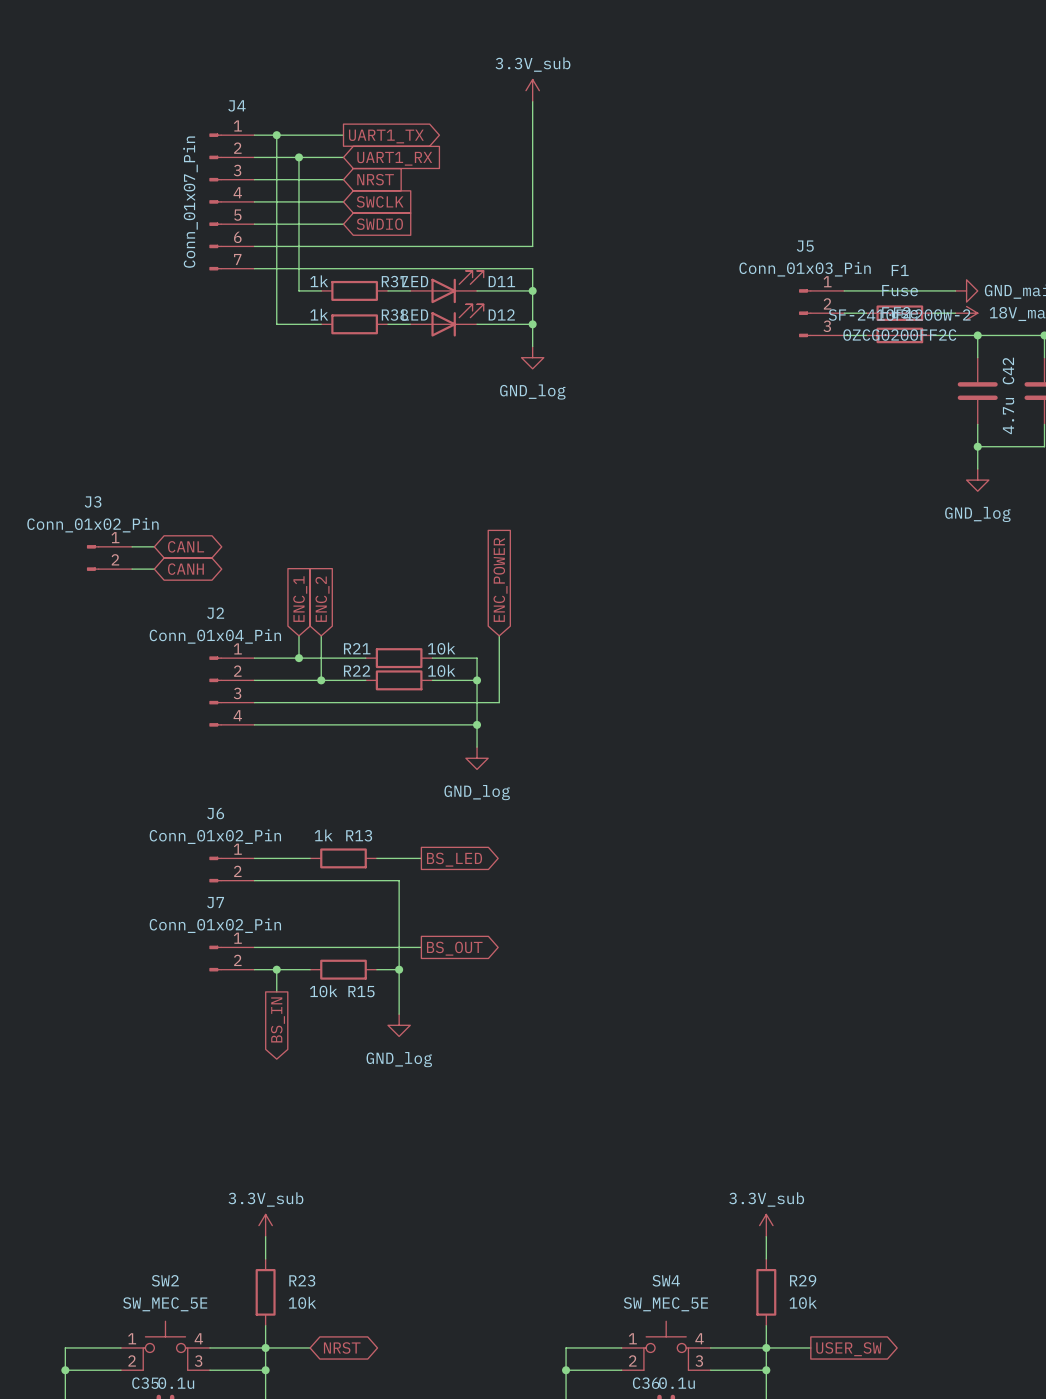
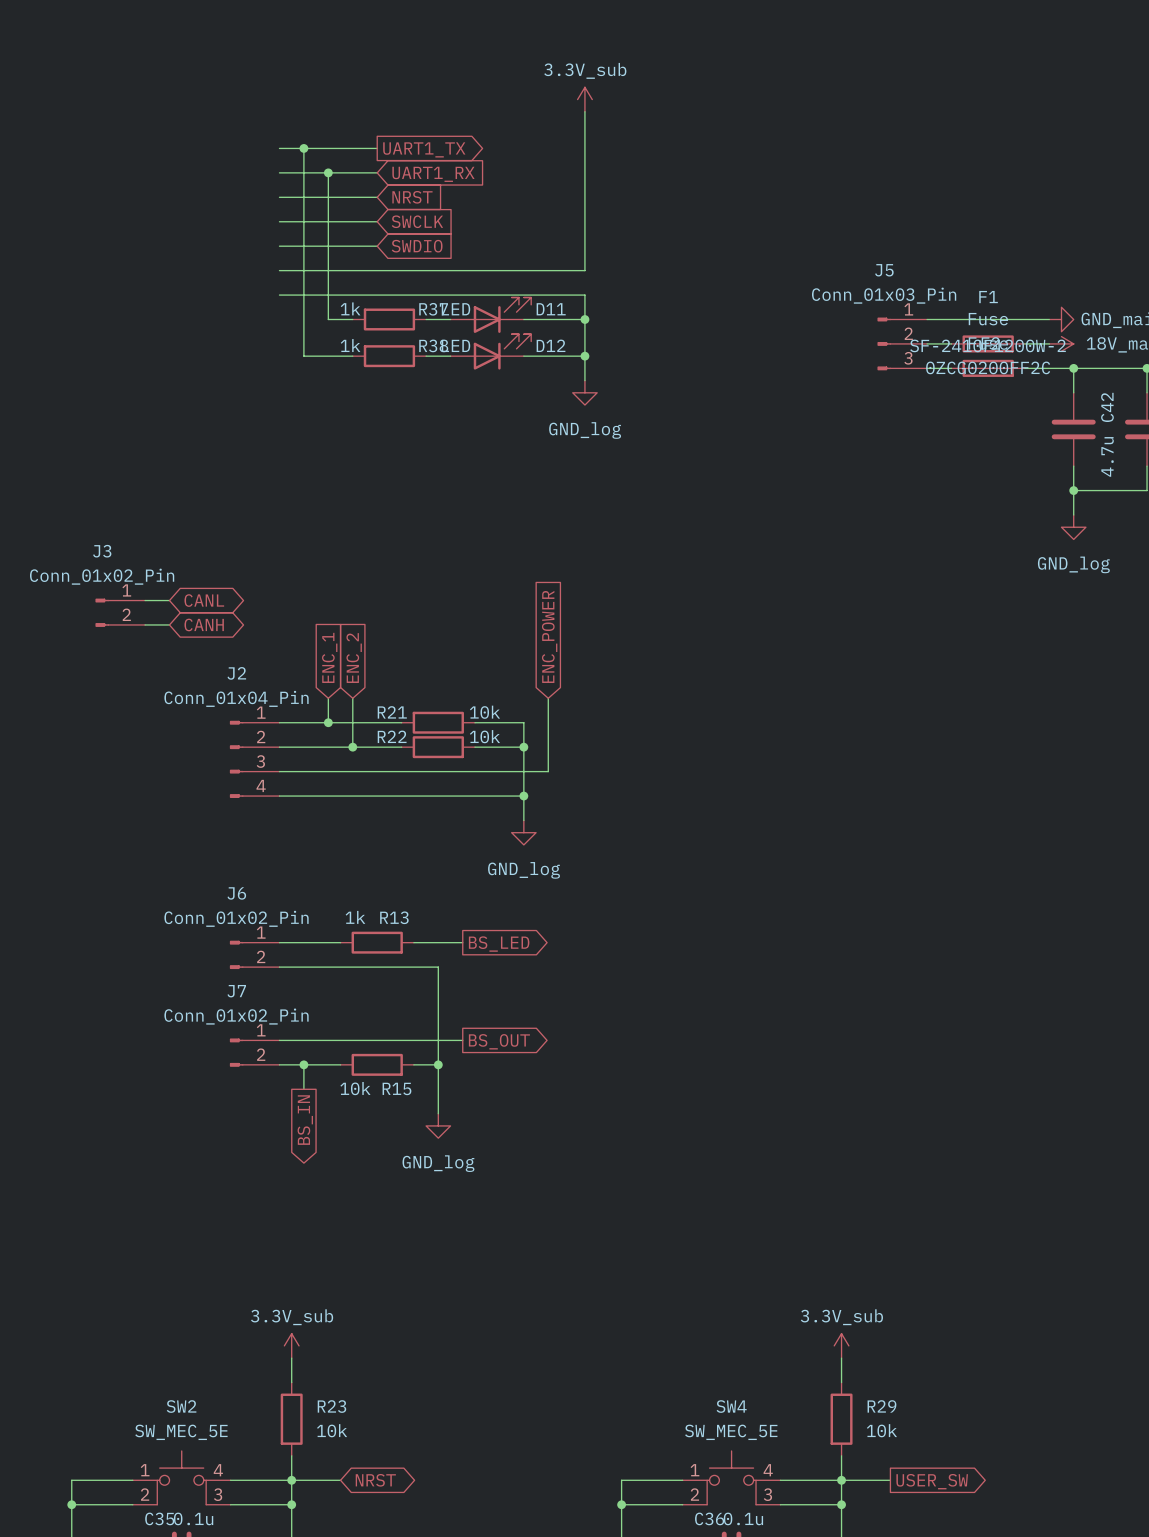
J4: Conn_01x07_Pin (231, 201) -> none

